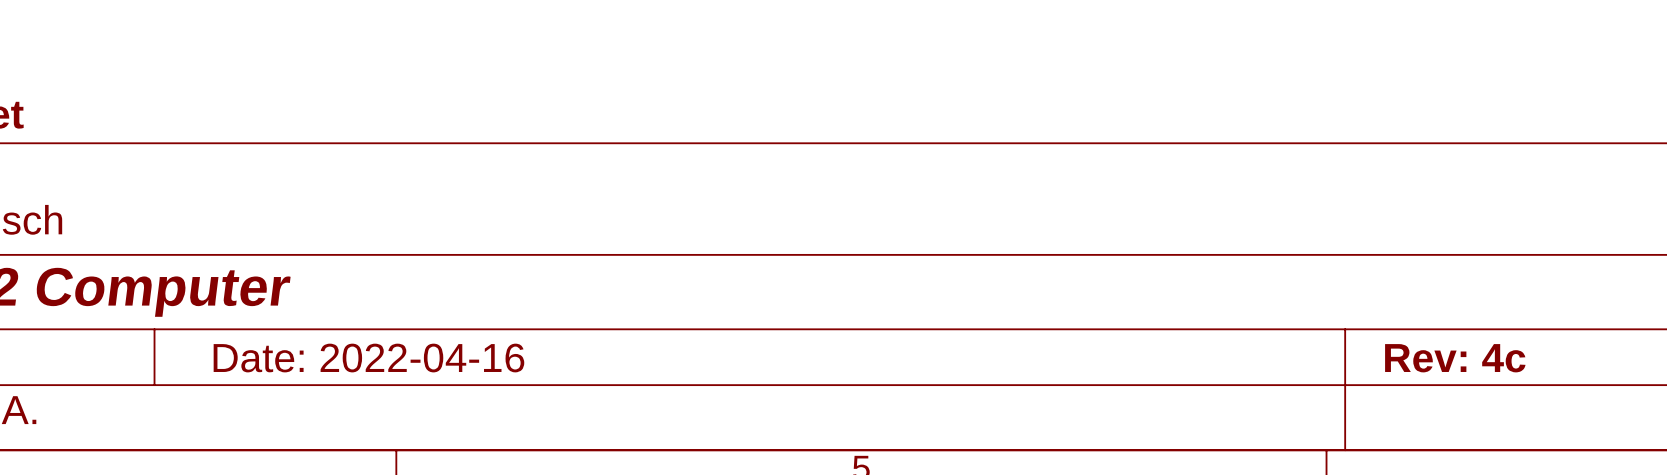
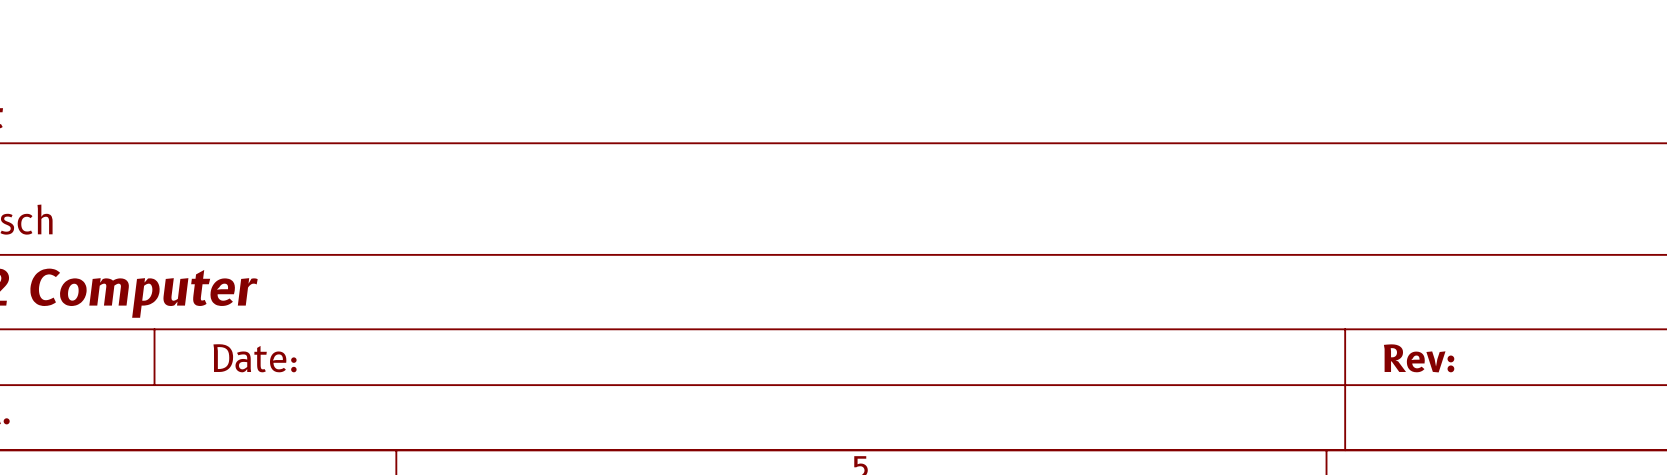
title block: Date: 2022-04-16 (368, 358) -> Date: (255, 358)
title block: Rev: 4c (1455, 358) -> Rev: (1419, 358)

